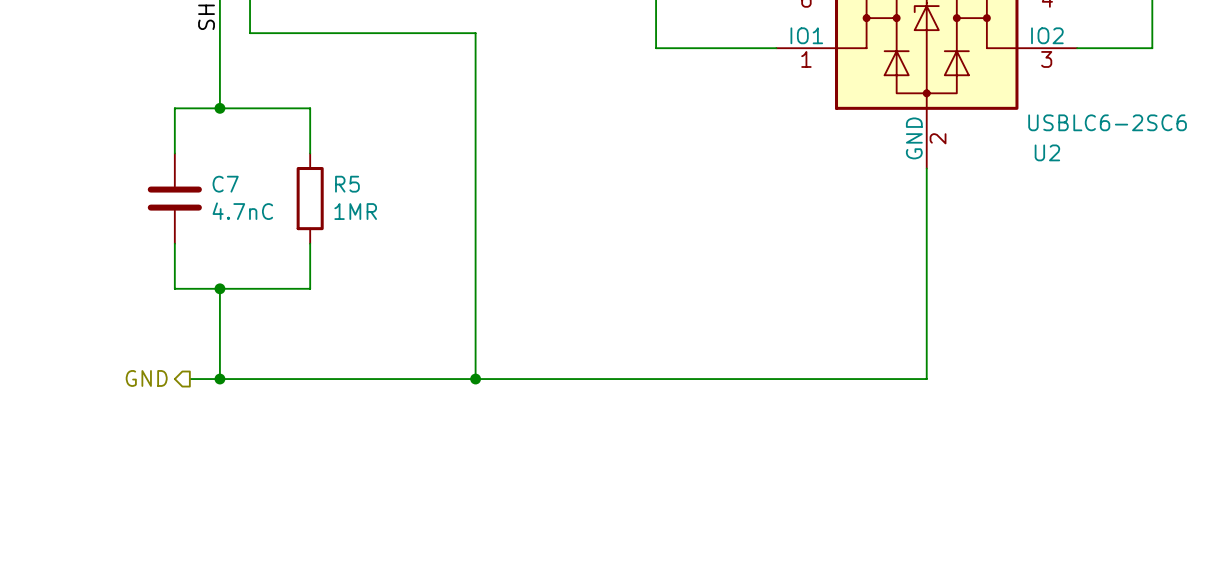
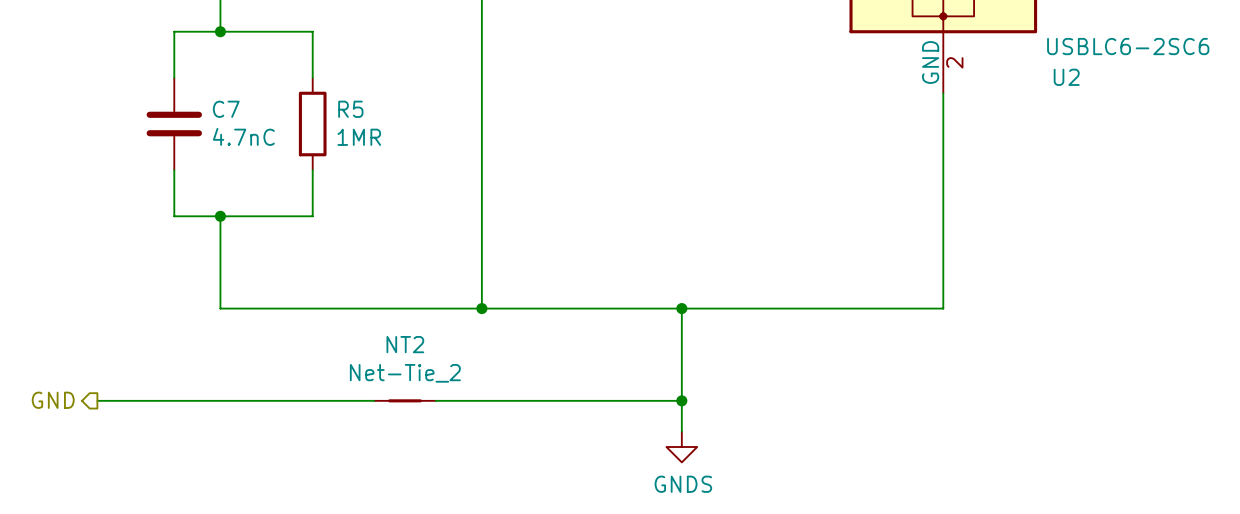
hierarchical label position: GND (146, 378) -> GND (53, 400)
wire: (189, 379) (219, 379) -> none
junction: (219, 379) -> none
wire: none -> (681, 308) (681, 431)
junction: none -> (681, 308)
wire: none -> (97, 400) (374, 400)
NT2: none -> Net-Tie_2 (404, 400)
wire: none -> (435, 400) (681, 400)
junction: none -> (681, 400)
power symbol: none -> GNDS (681, 446)

